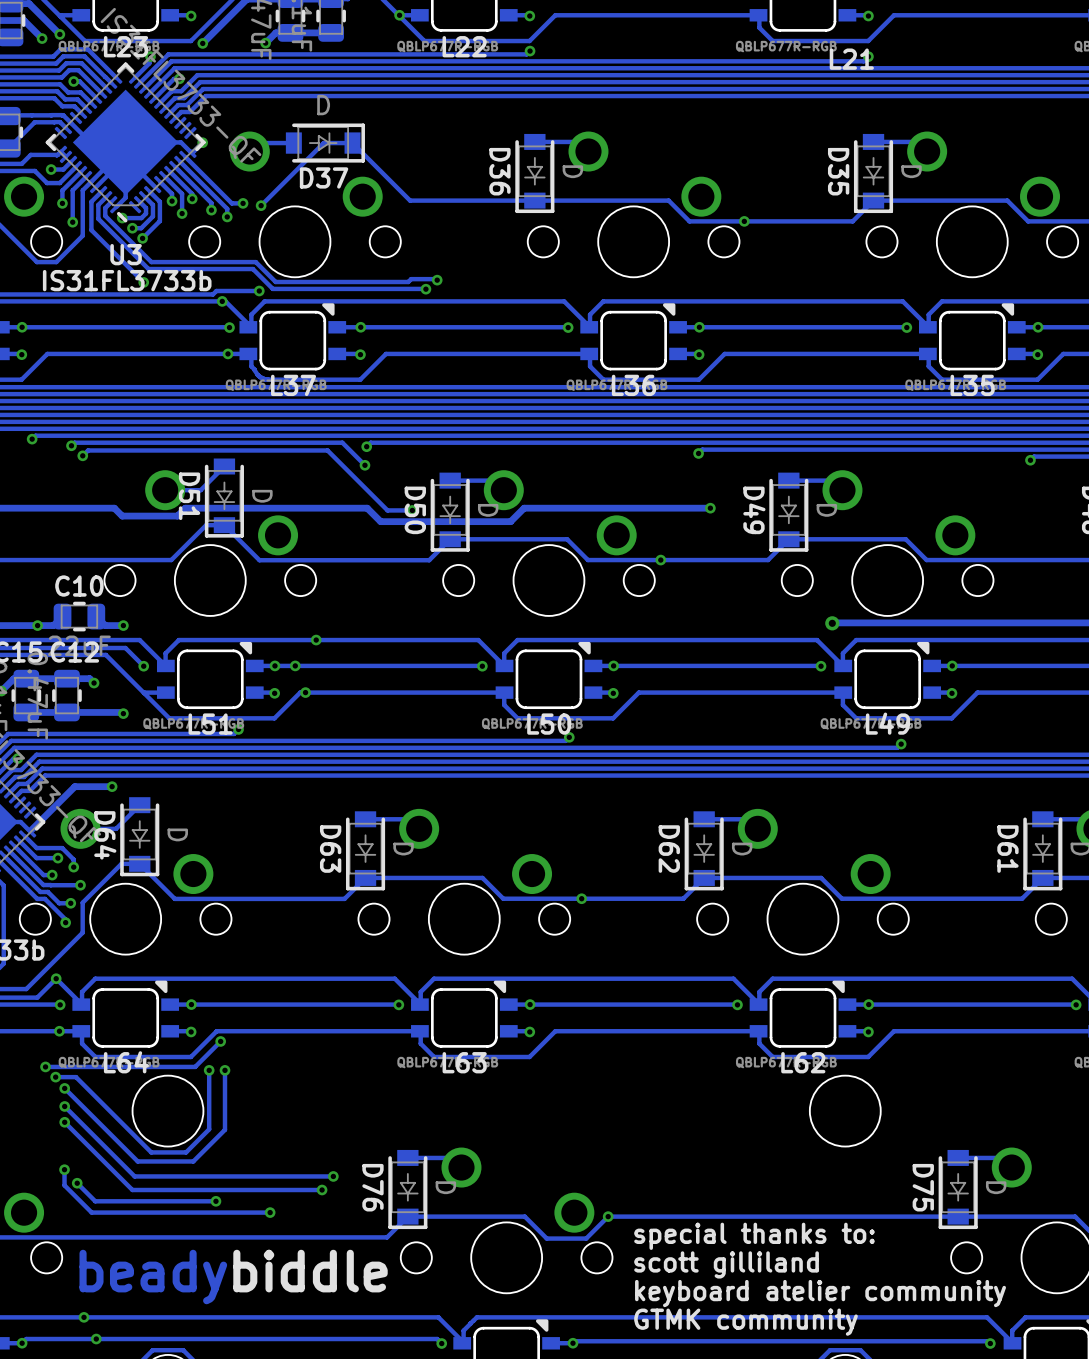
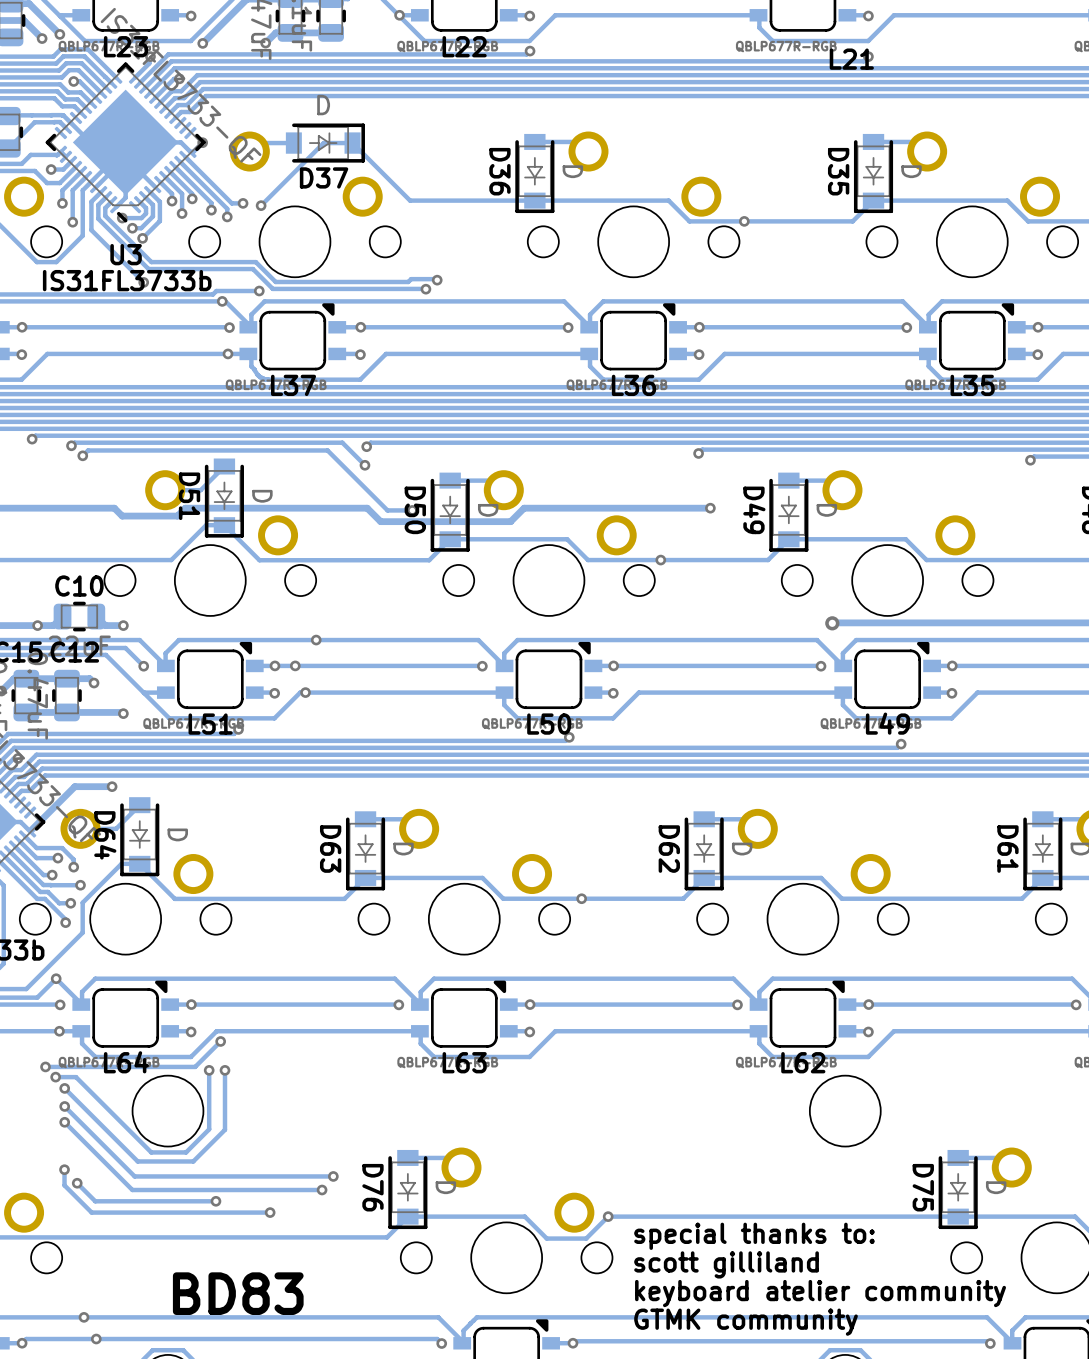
text: biddle (310, 1271) -> none
text: beady (153, 1277) -> none
text: none -> BD83 (238, 1293)

